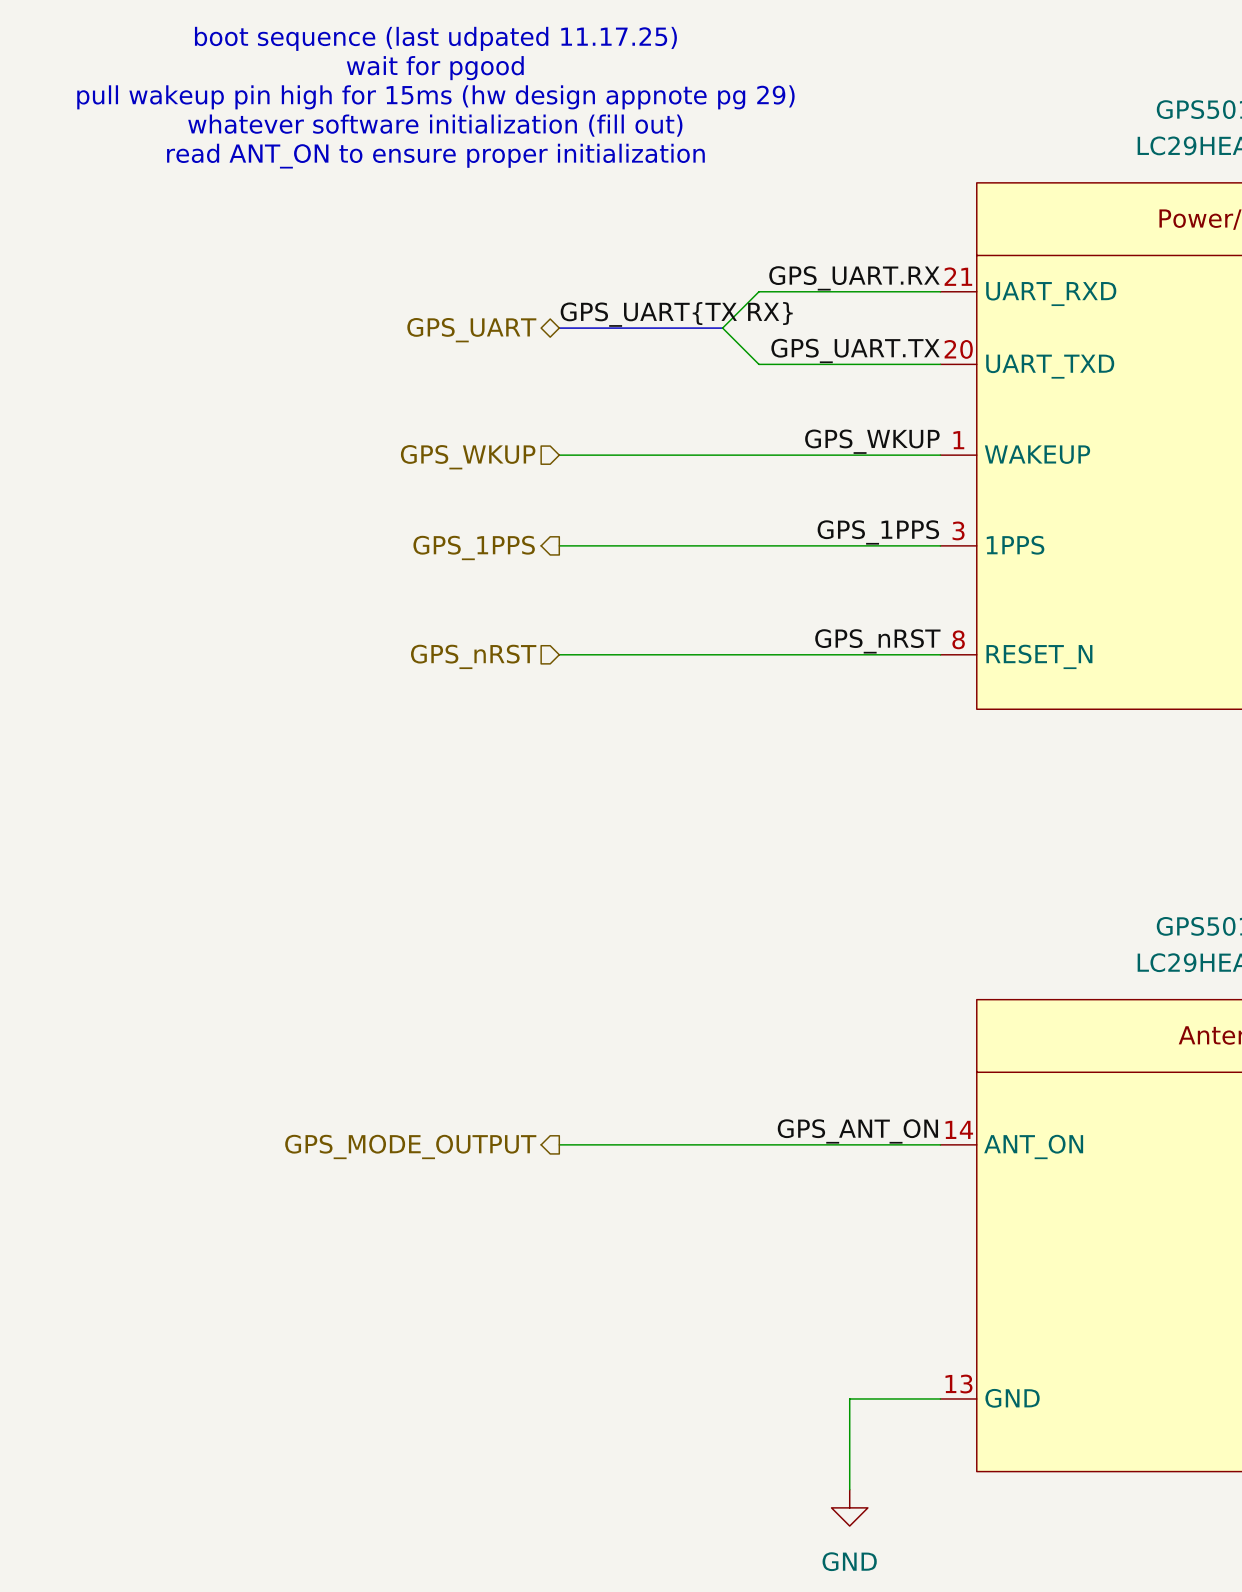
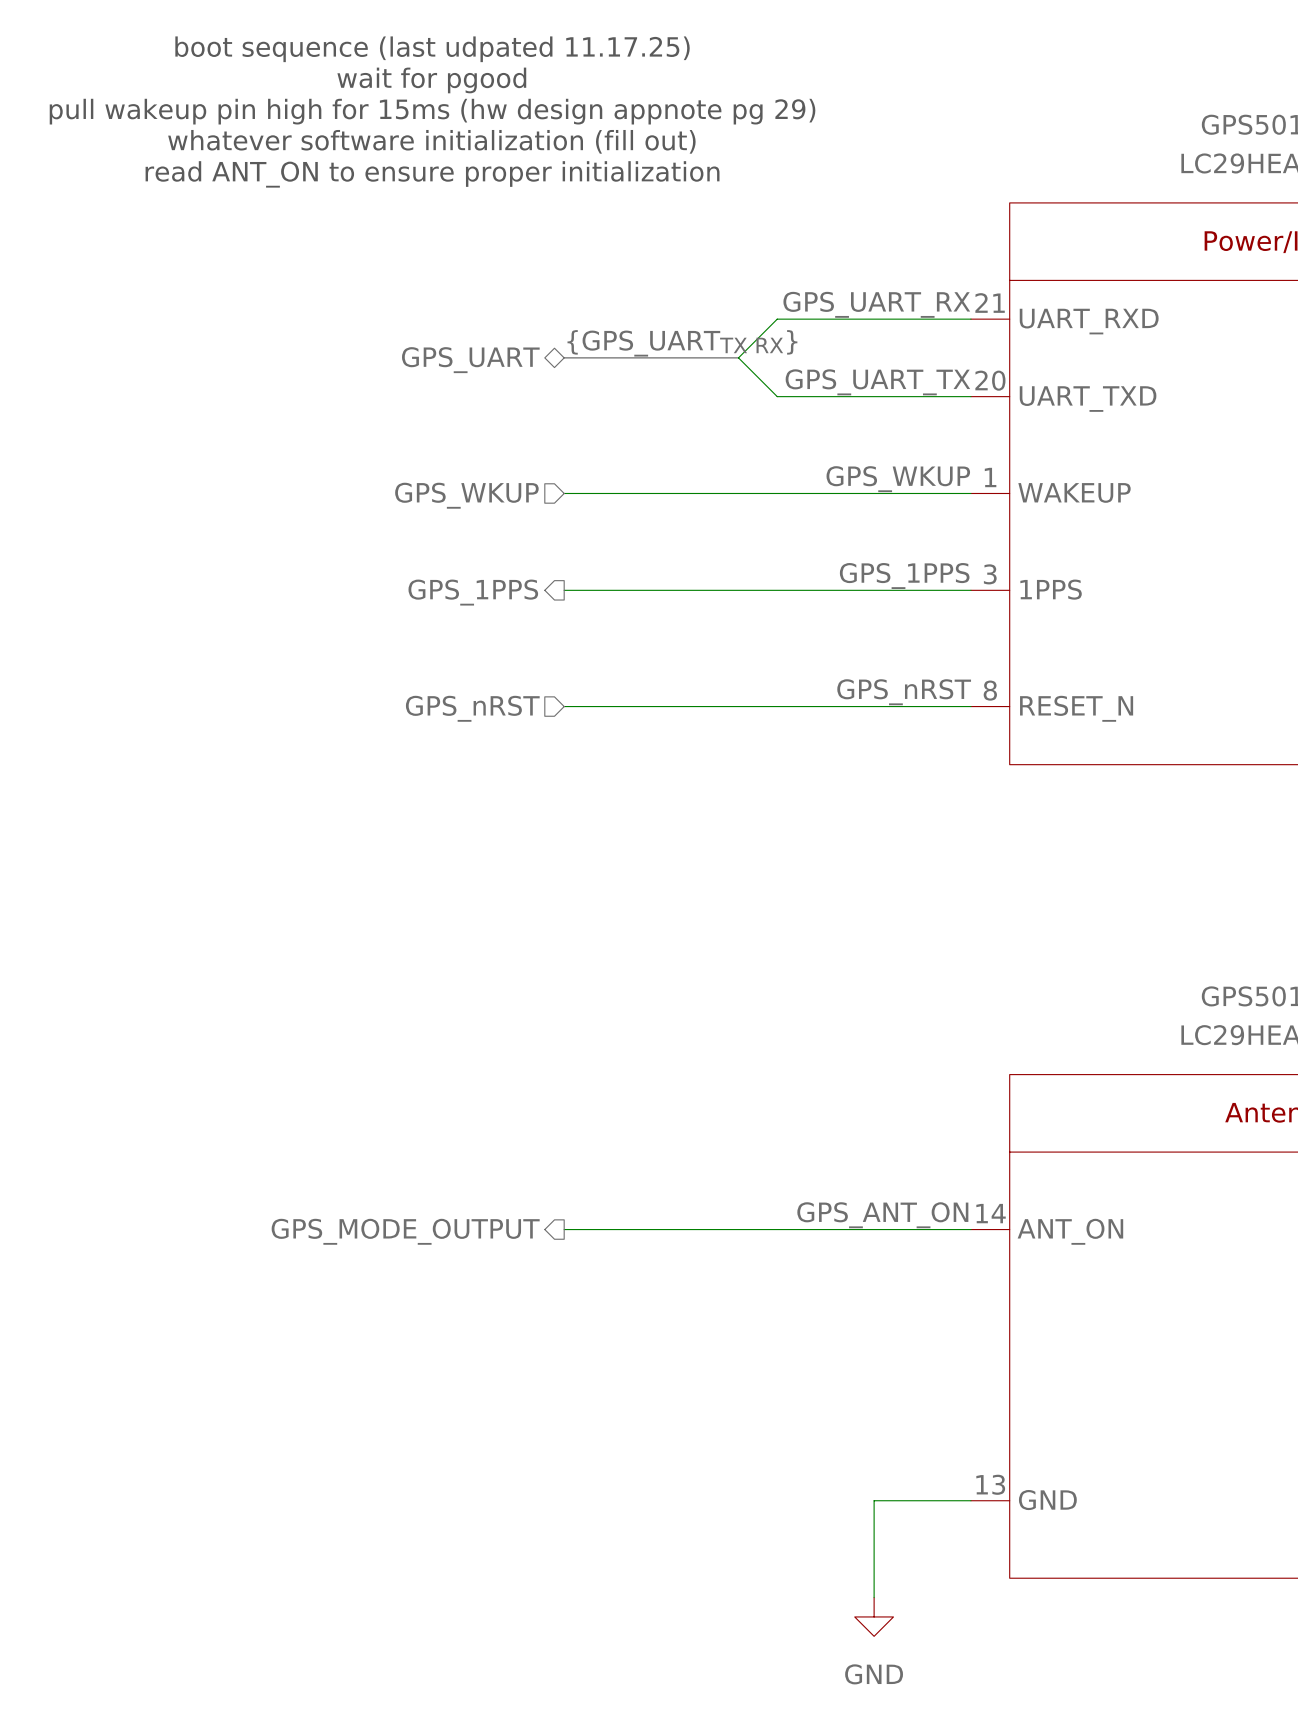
label: GPS_UART.RX (854, 278) -> GPS_UART_RX (876, 304)
label: GPS_UART{TX RX} (676, 314) -> {GPS_UARTTX RX} (682, 343)
label: GPS_UART.TX (855, 350) -> GPS_UART_TX (877, 382)

